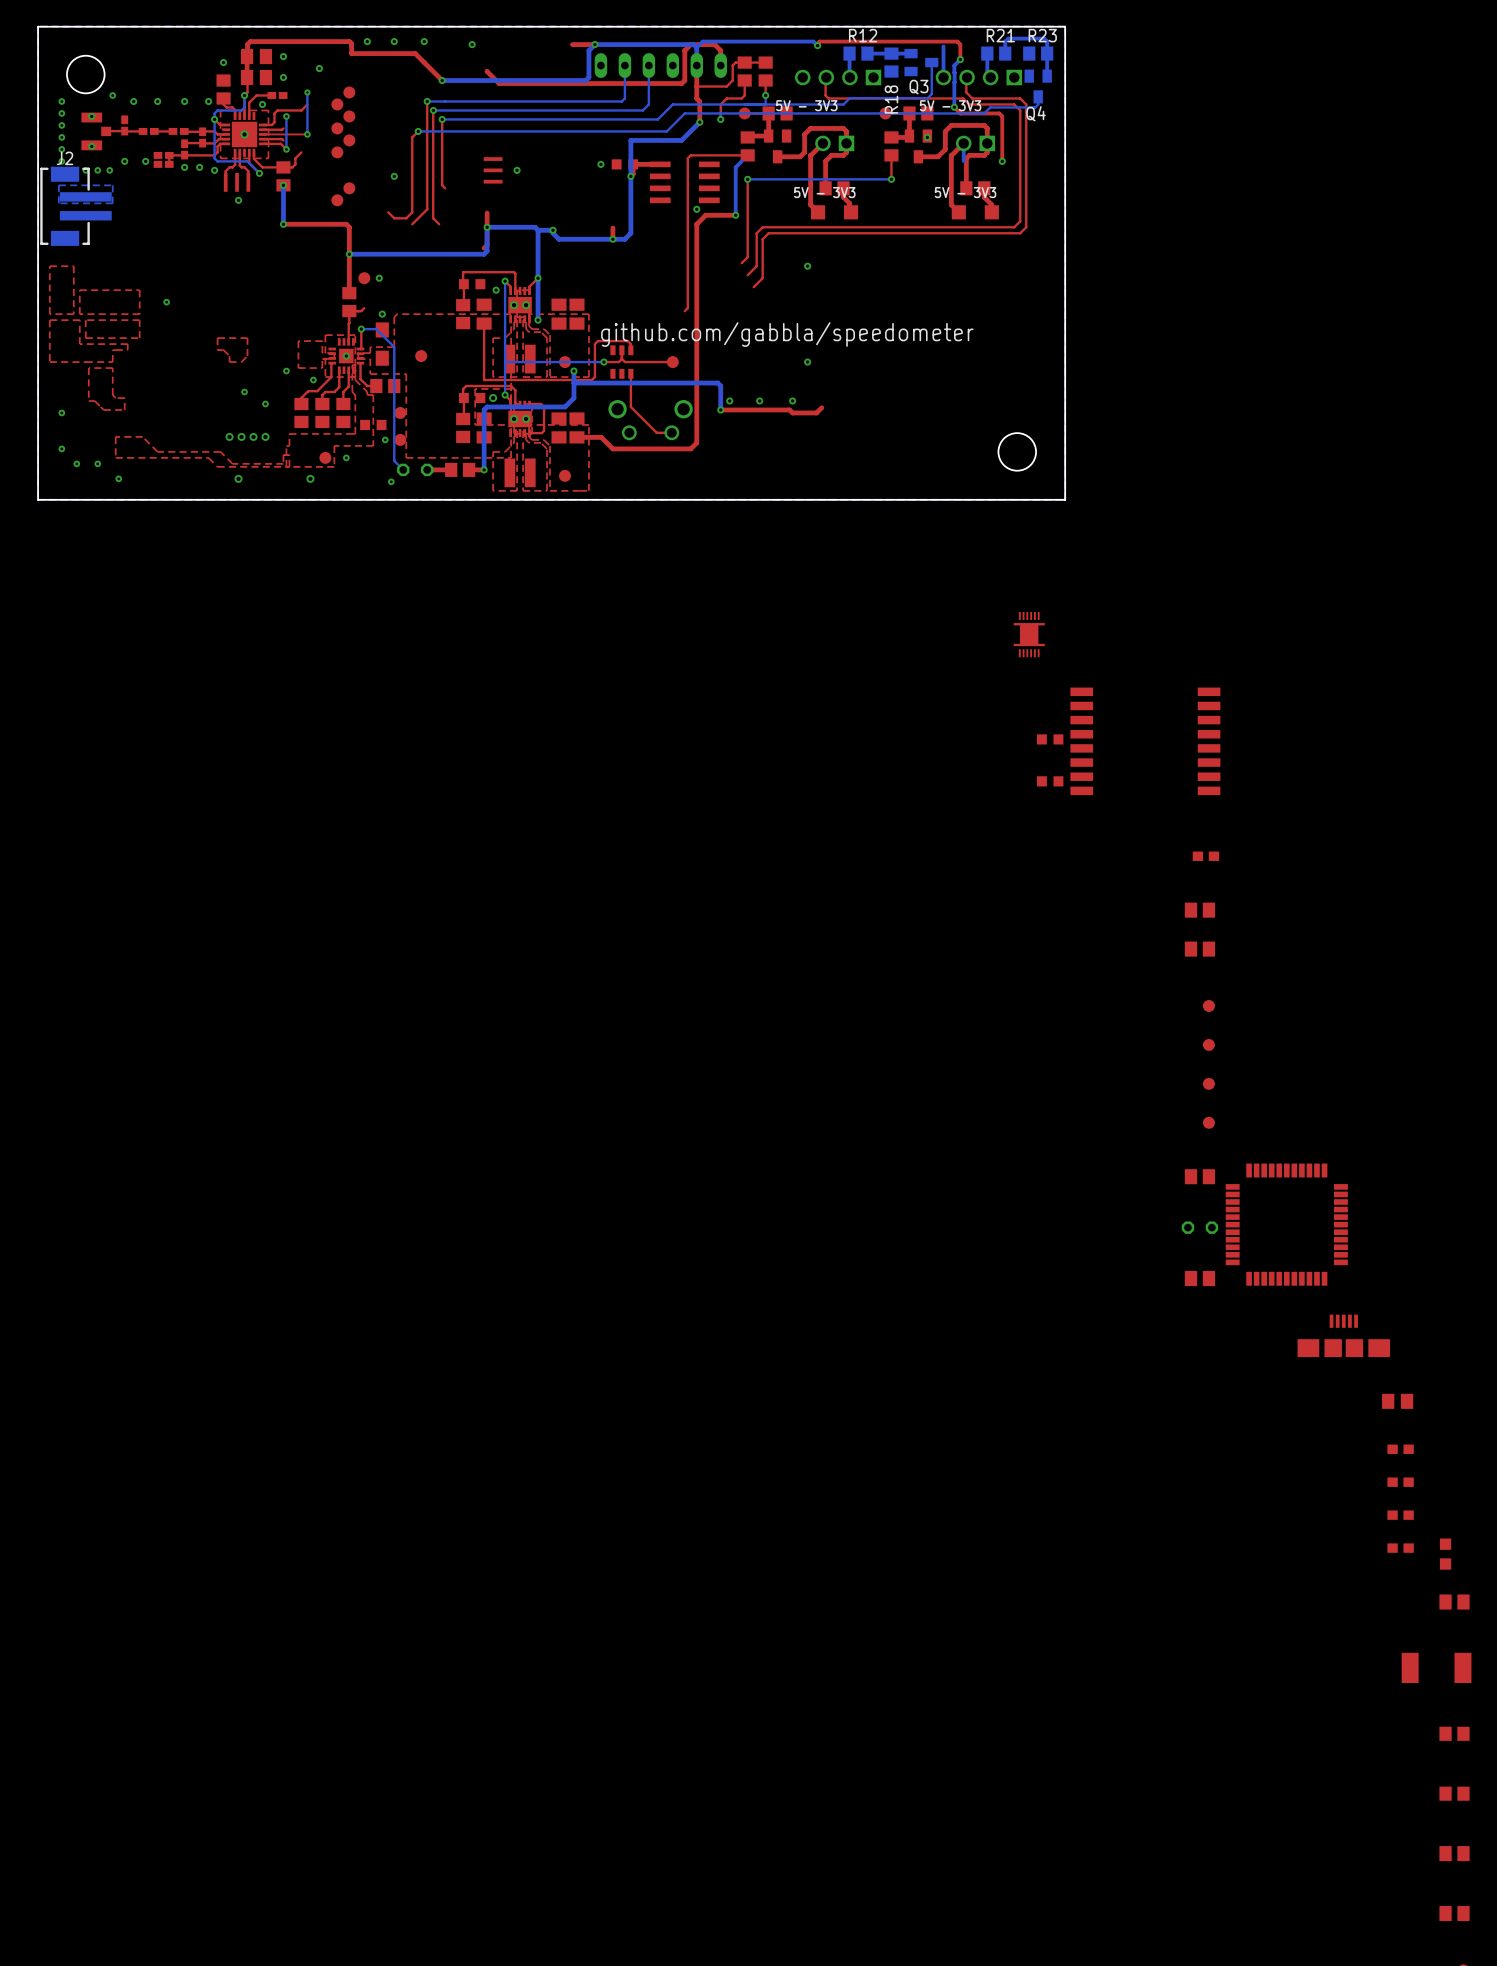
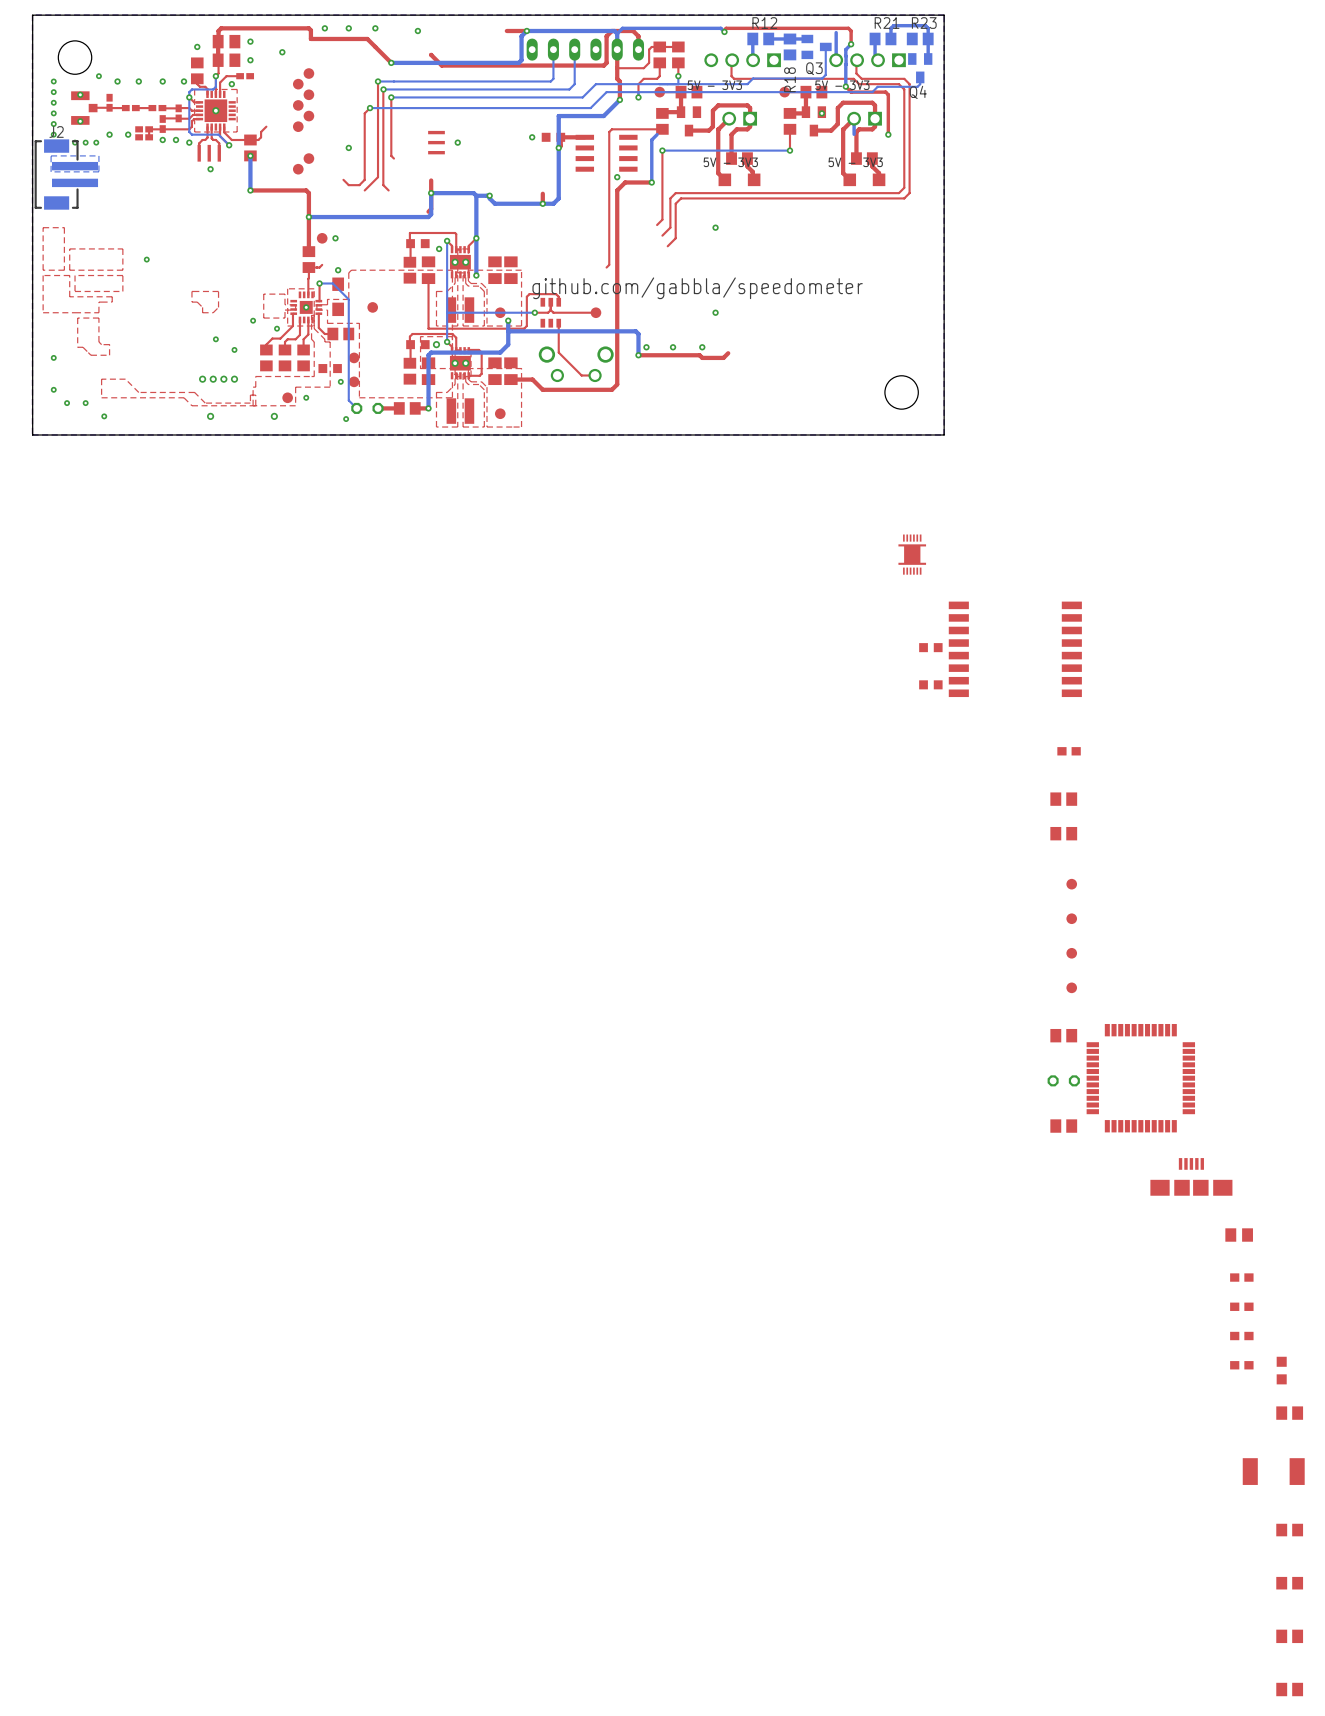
bottom track: (307, 92) (307, 134) -> none
via: (307, 92) -> none
top track: (307, 104) (301, 110) (277, 110) (274, 113) (274, 122) (271, 125) (262, 125) -> none
bottom track: (286, 116) (286, 149) -> none
via: (286, 116) -> none
top track: (283, 128) (262, 129) -> none
top track: (307, 134) (262, 134) -> none
via: (307, 134) -> none
top track: (262, 139) (283, 140) -> none
top track: (262, 143) (280, 143) (286, 149) -> none
via: (286, 149) -> none

